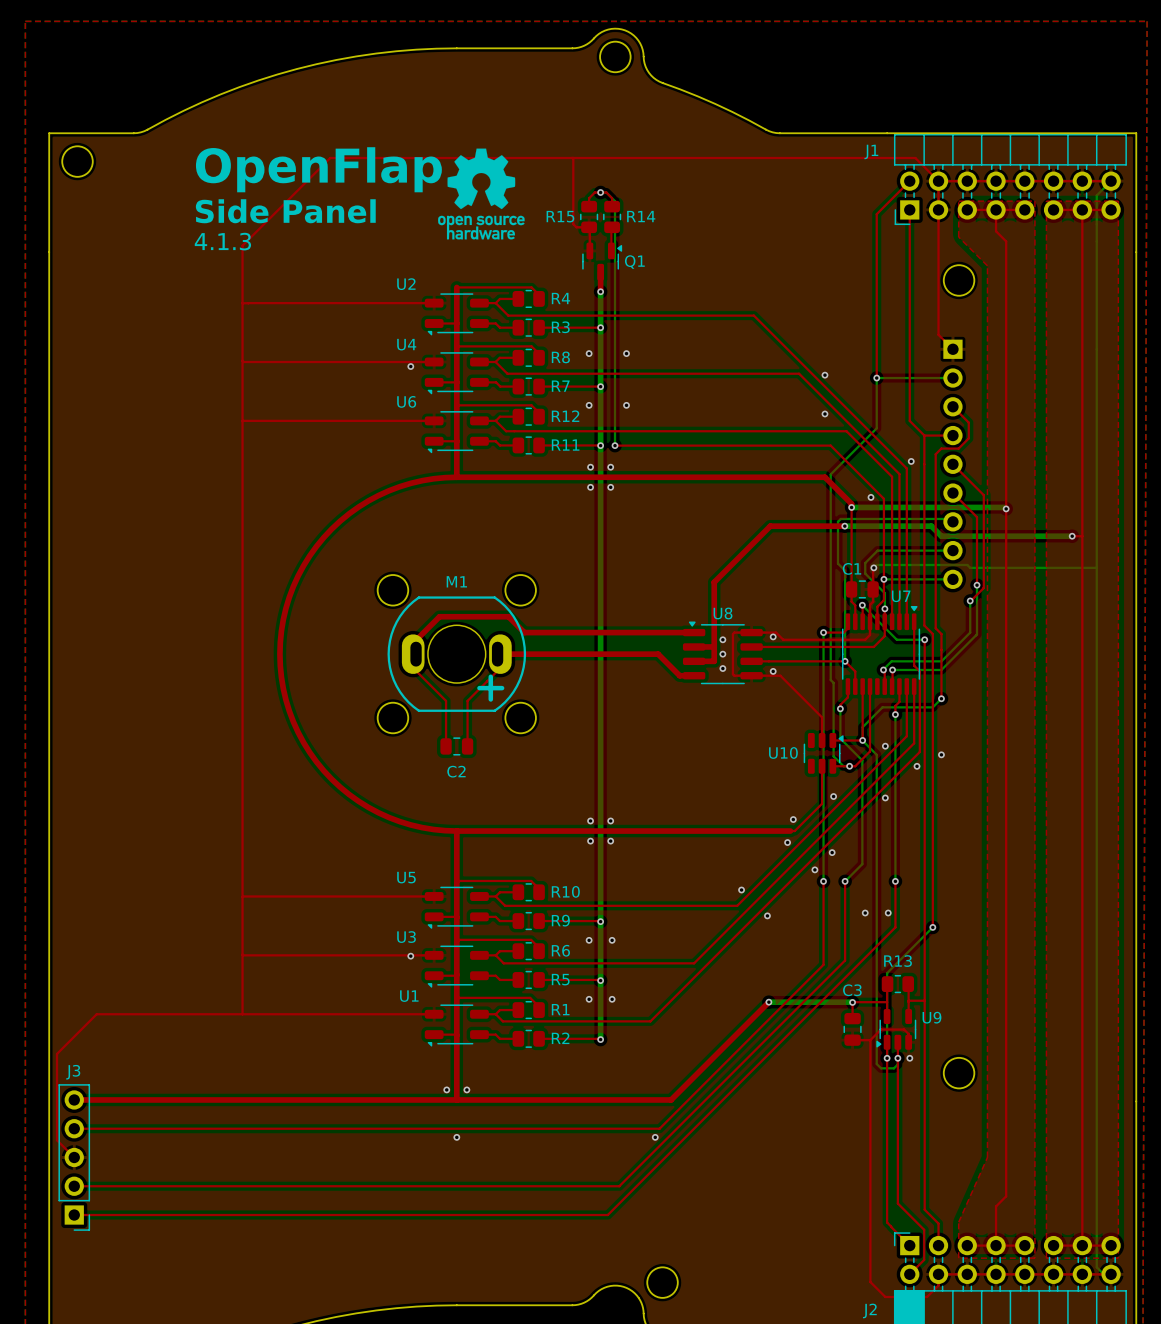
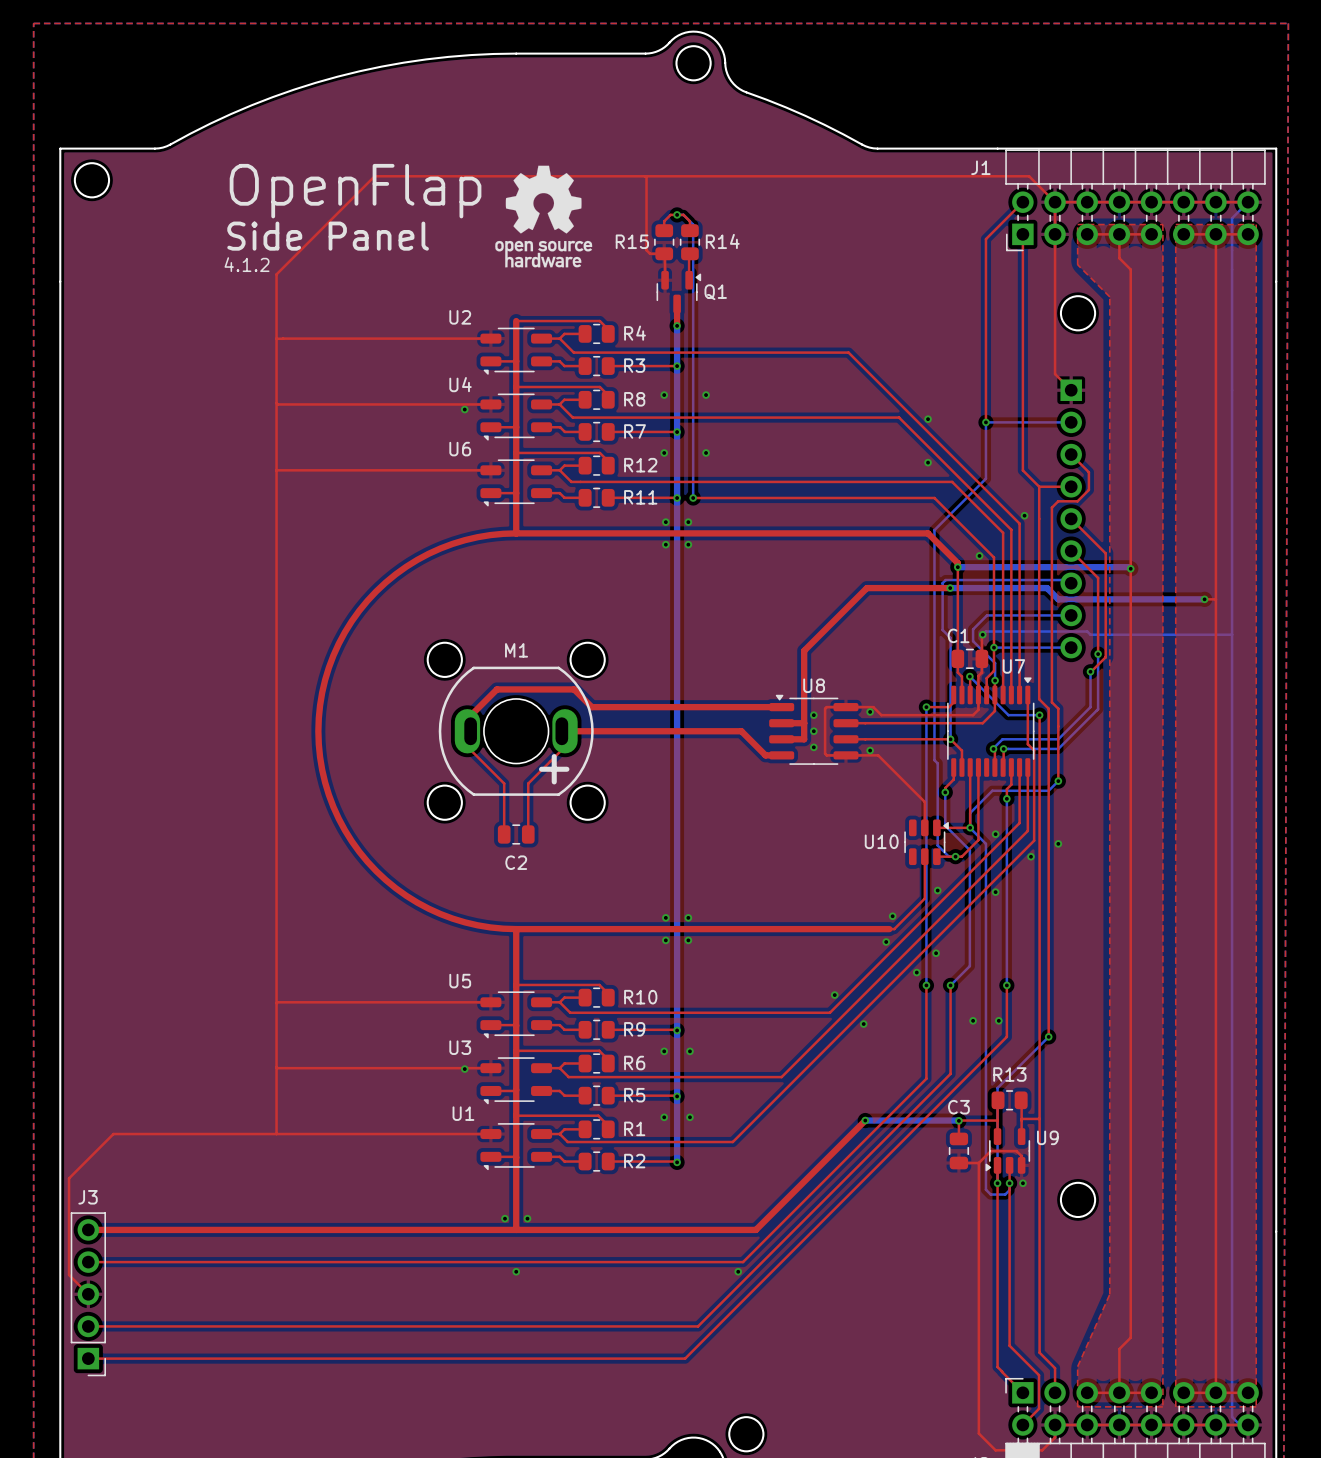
text: 4.1.3 (222, 241) -> 4.1.2 (247, 264)

